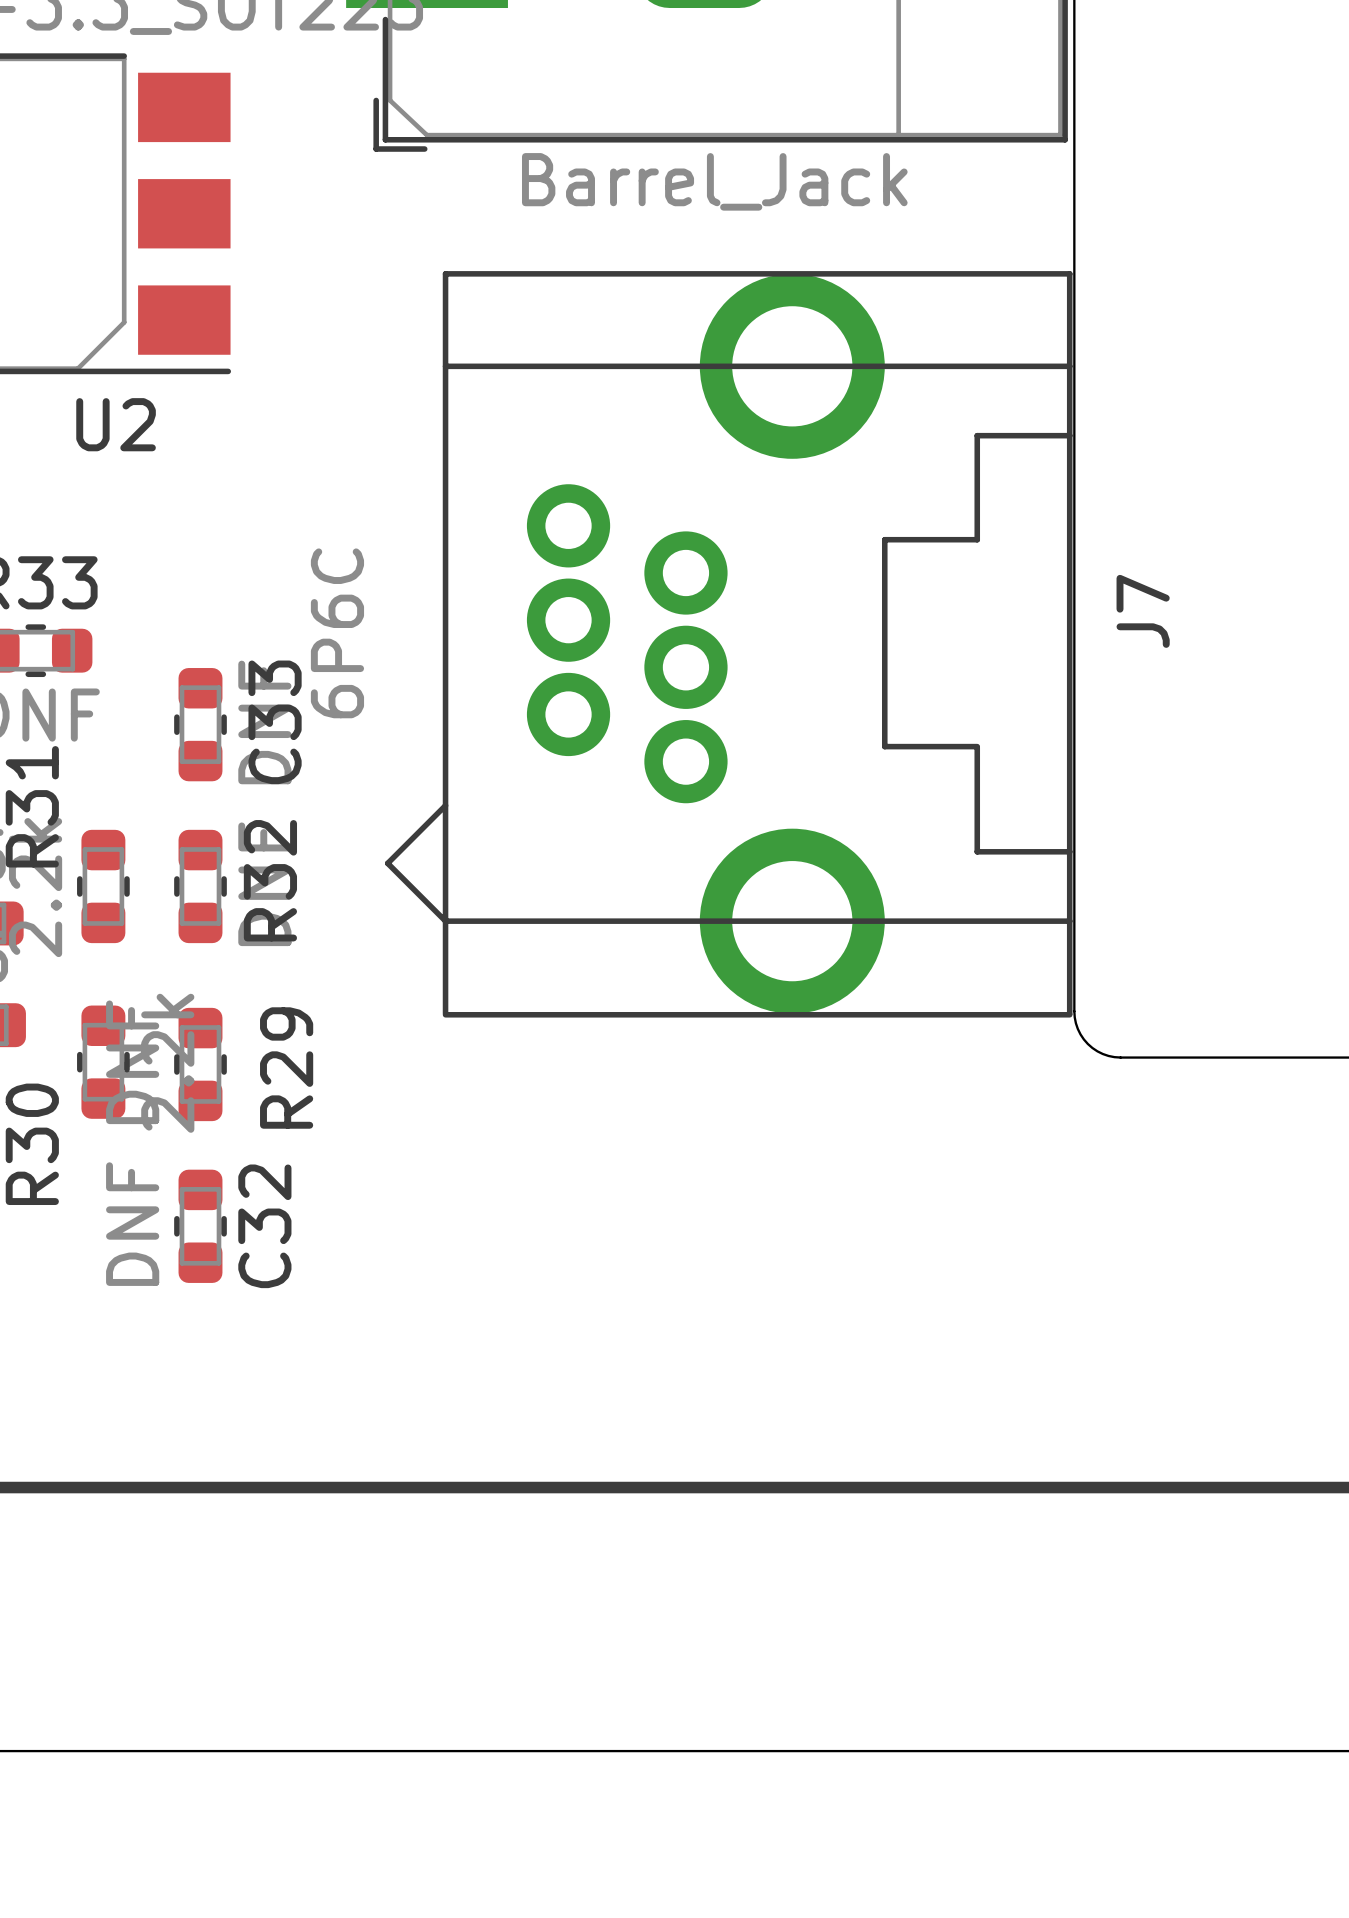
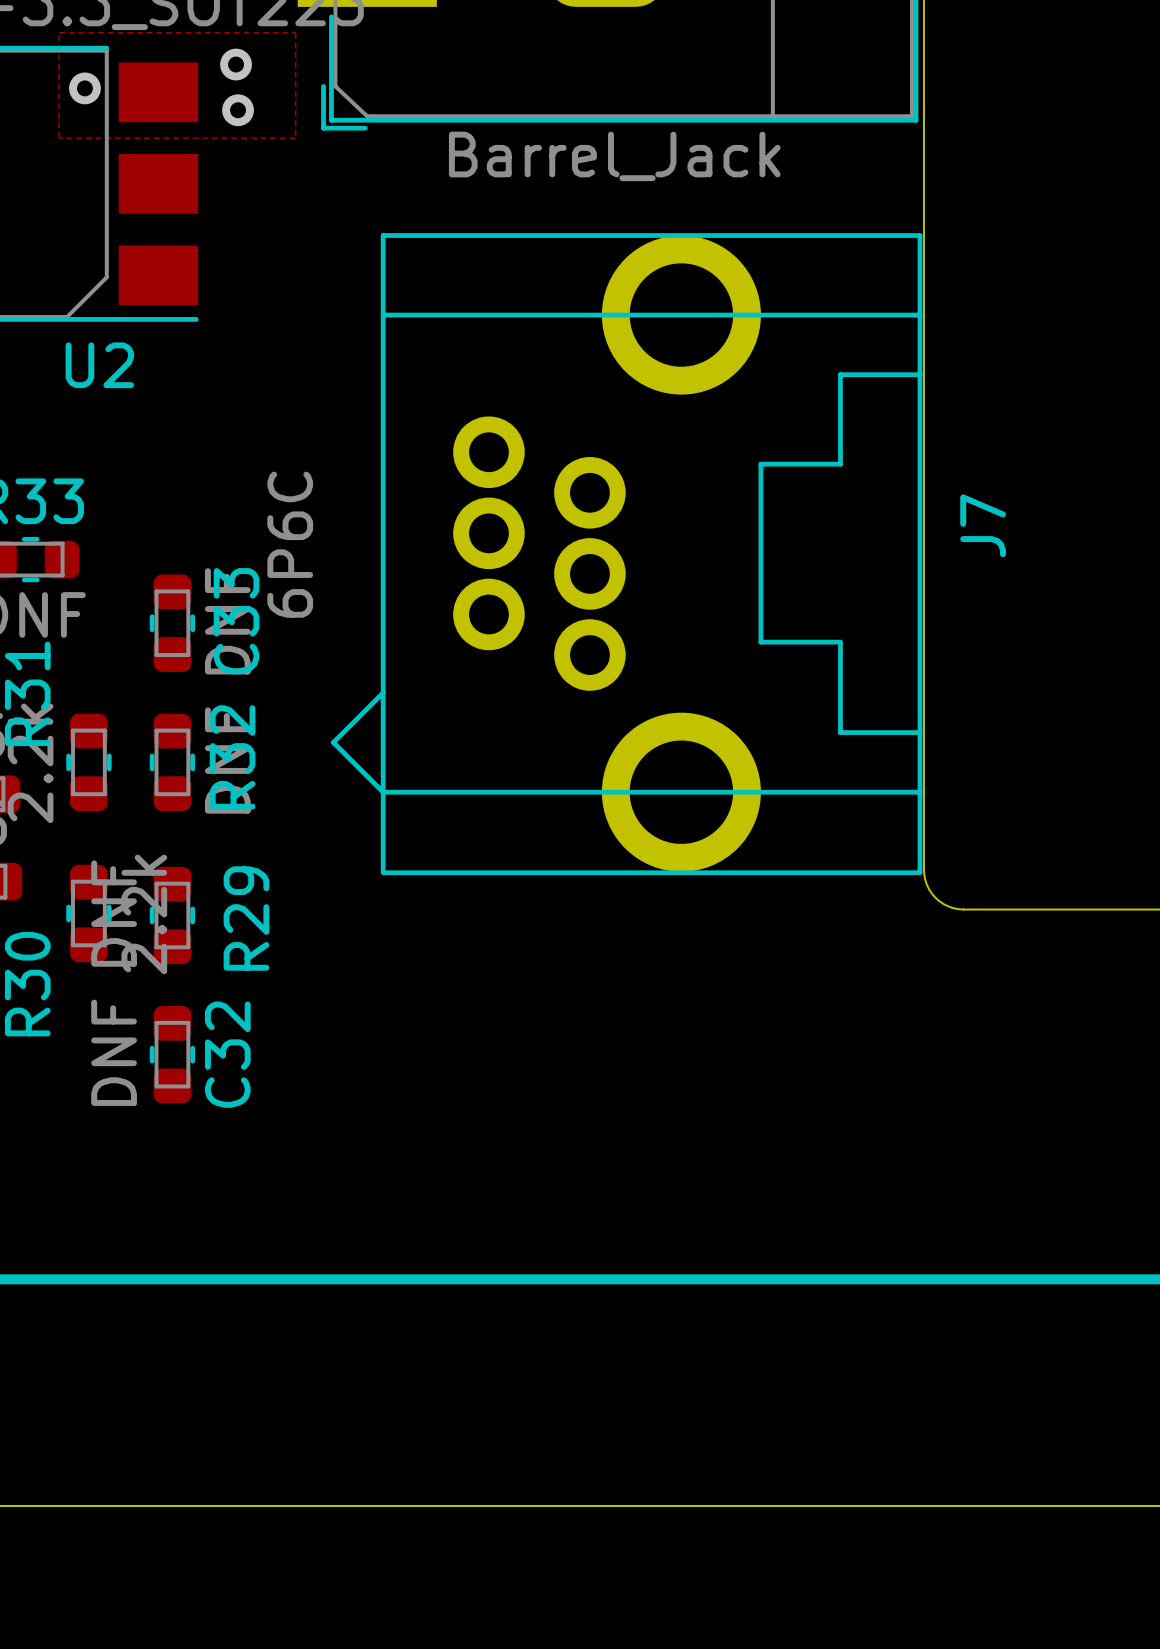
zone outline: none -> (59, 32) (59, 138) (295, 138) (295, 32) (59, 32)
via: none -> (236, 64)
via: none -> (84, 88)
via: none -> (238, 110)

